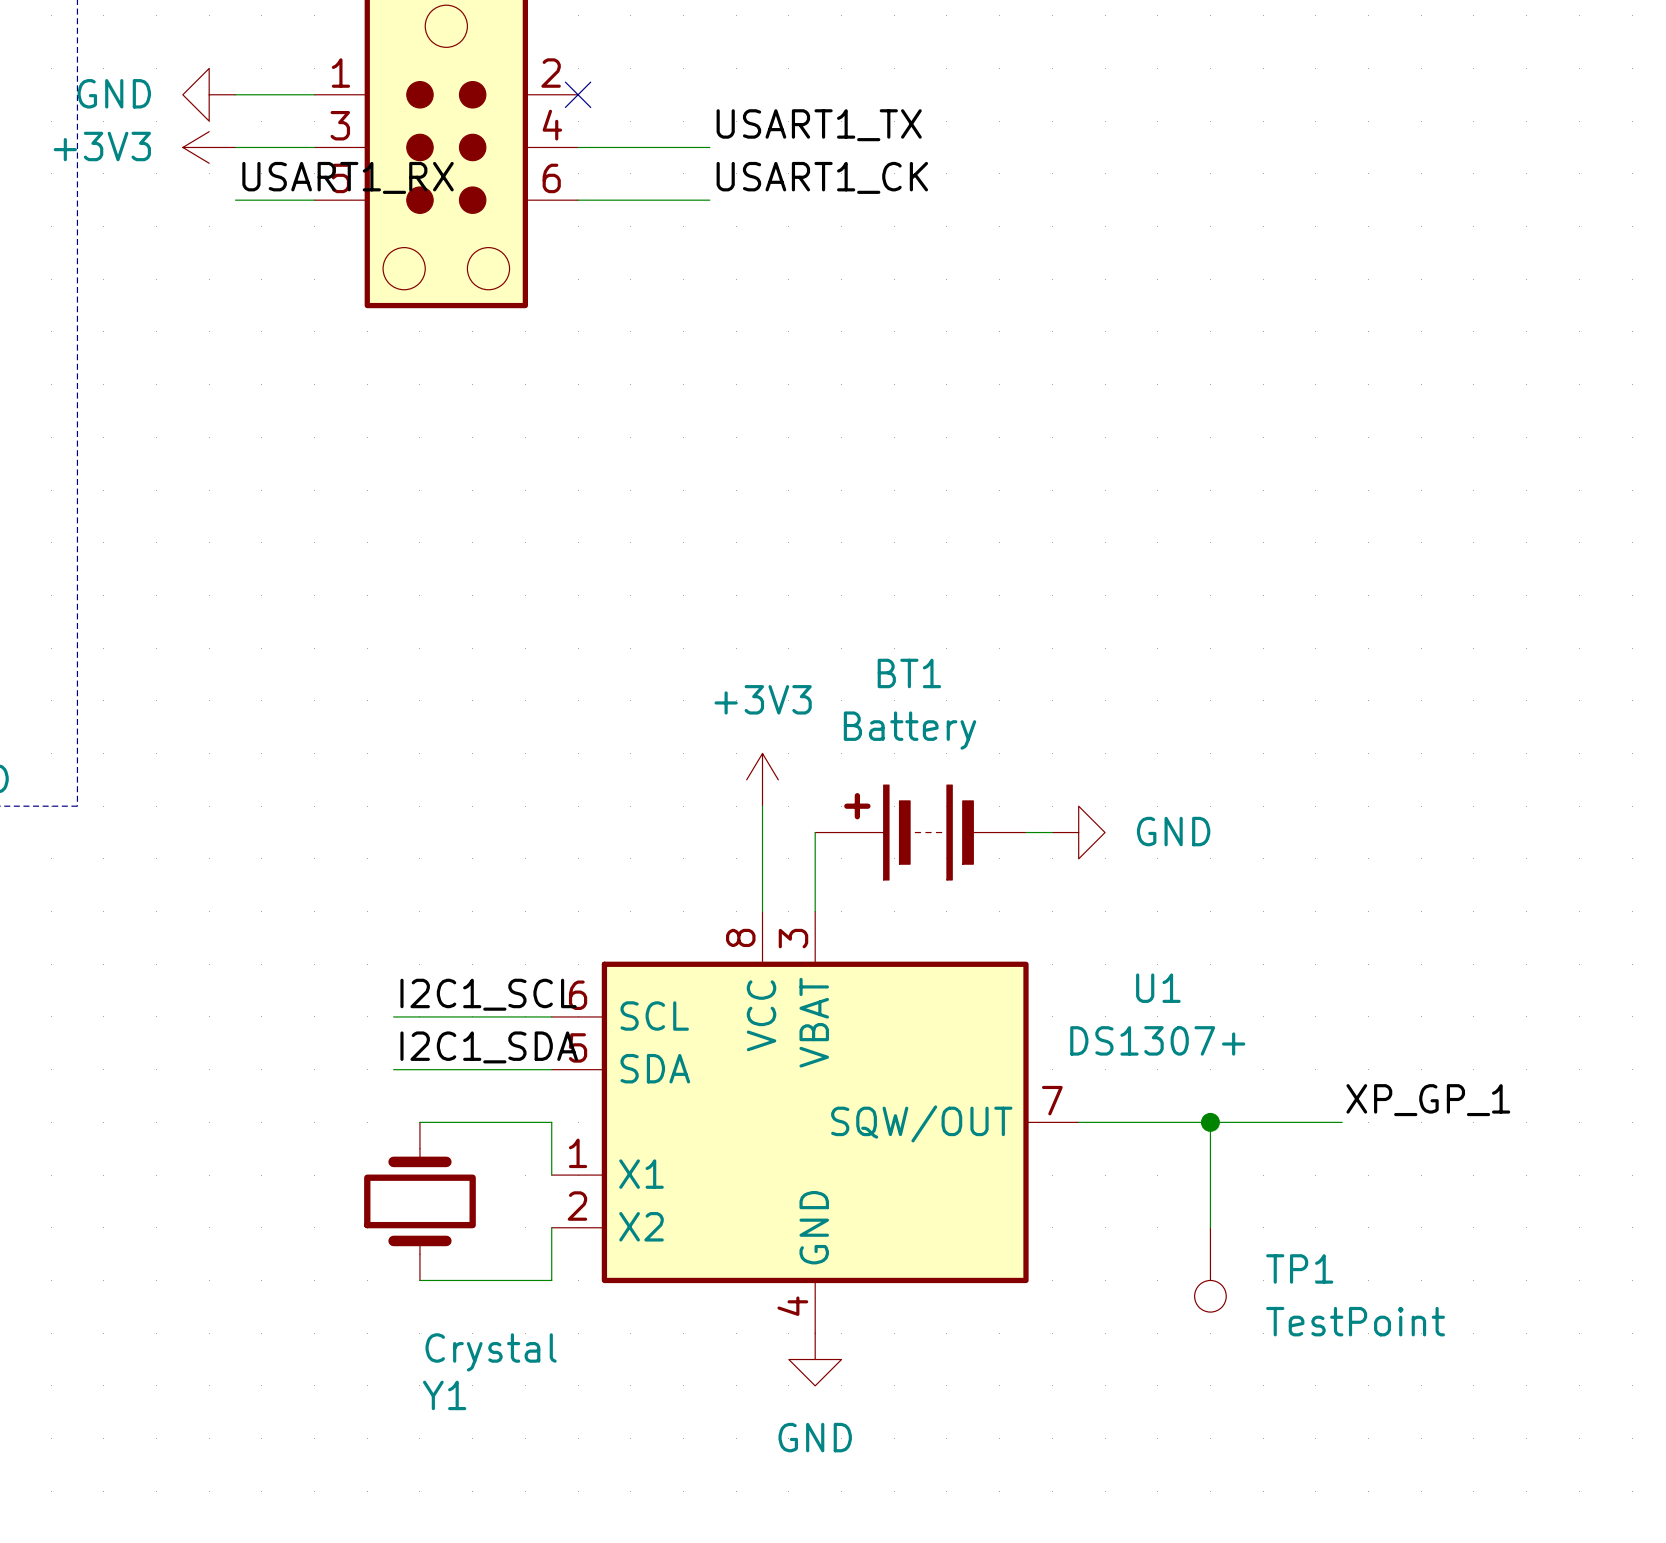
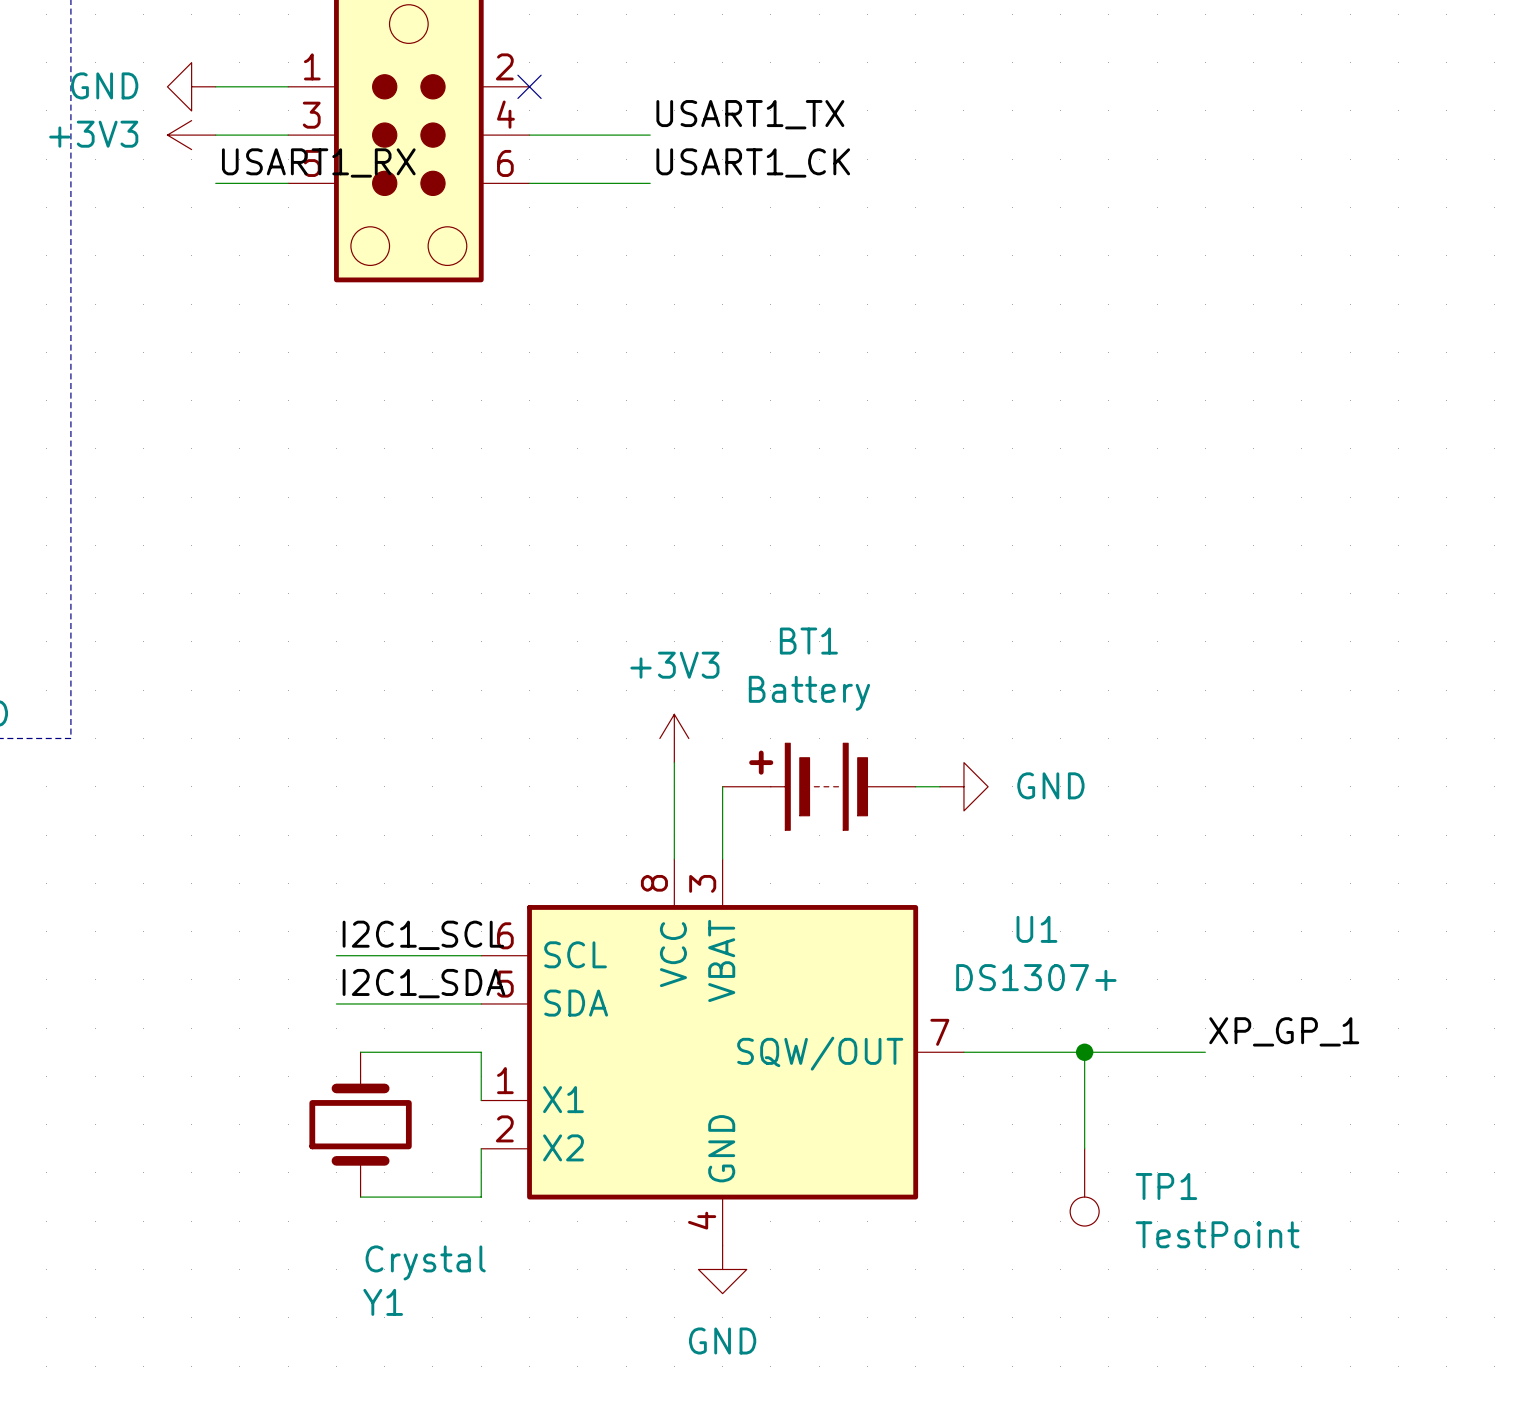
power symbol position: +3V3 (762, 779) -> +3V3 (674, 738)
wire: (762, 806) (762, 911) -> (674, 762) (674, 859)
wire: (815, 832) (815, 911) -> (722, 786) (722, 859)
BT1 position: (920, 832) -> (819, 786)
wire: (1025, 832) (1052, 832) -> (915, 786) (939, 786)
power symbol position: GND (1078, 832) -> GND (963, 786)
label position: I2C1_SCL (488, 994) -> I2C1_SCL (423, 935)
wire: (393, 1016) (551, 1016) -> (336, 955) (481, 955)
label position: I2C1_SDA (489, 1047) -> I2C1_SDA (423, 983)
wire: (393, 1069) (551, 1069) -> (336, 1003) (481, 1003)
label position: XP_GP_1 (1428, 1100) -> XP_GP_1 (1284, 1031)
wire: (419, 1122) (551, 1122) (551, 1175) -> (360, 1052) (481, 1052) (481, 1100)
U1 position: (815, 1122) -> (722, 1052)
wire: (1078, 1122) (1342, 1122) -> (963, 1052) (1205, 1052)
wire: (1210, 1122) (1210, 1227) -> (1084, 1052) (1084, 1148)
junction position: (1210, 1122) -> (1084, 1052)
Y1 position: (419, 1201) -> (360, 1124)
wire: (551, 1227) (551, 1280) (419, 1280) -> (481, 1148) (481, 1197) (360, 1197)
TP1 position: (1210, 1269) -> (1084, 1187)
power symbol position: GND (815, 1359) -> GND (722, 1269)

